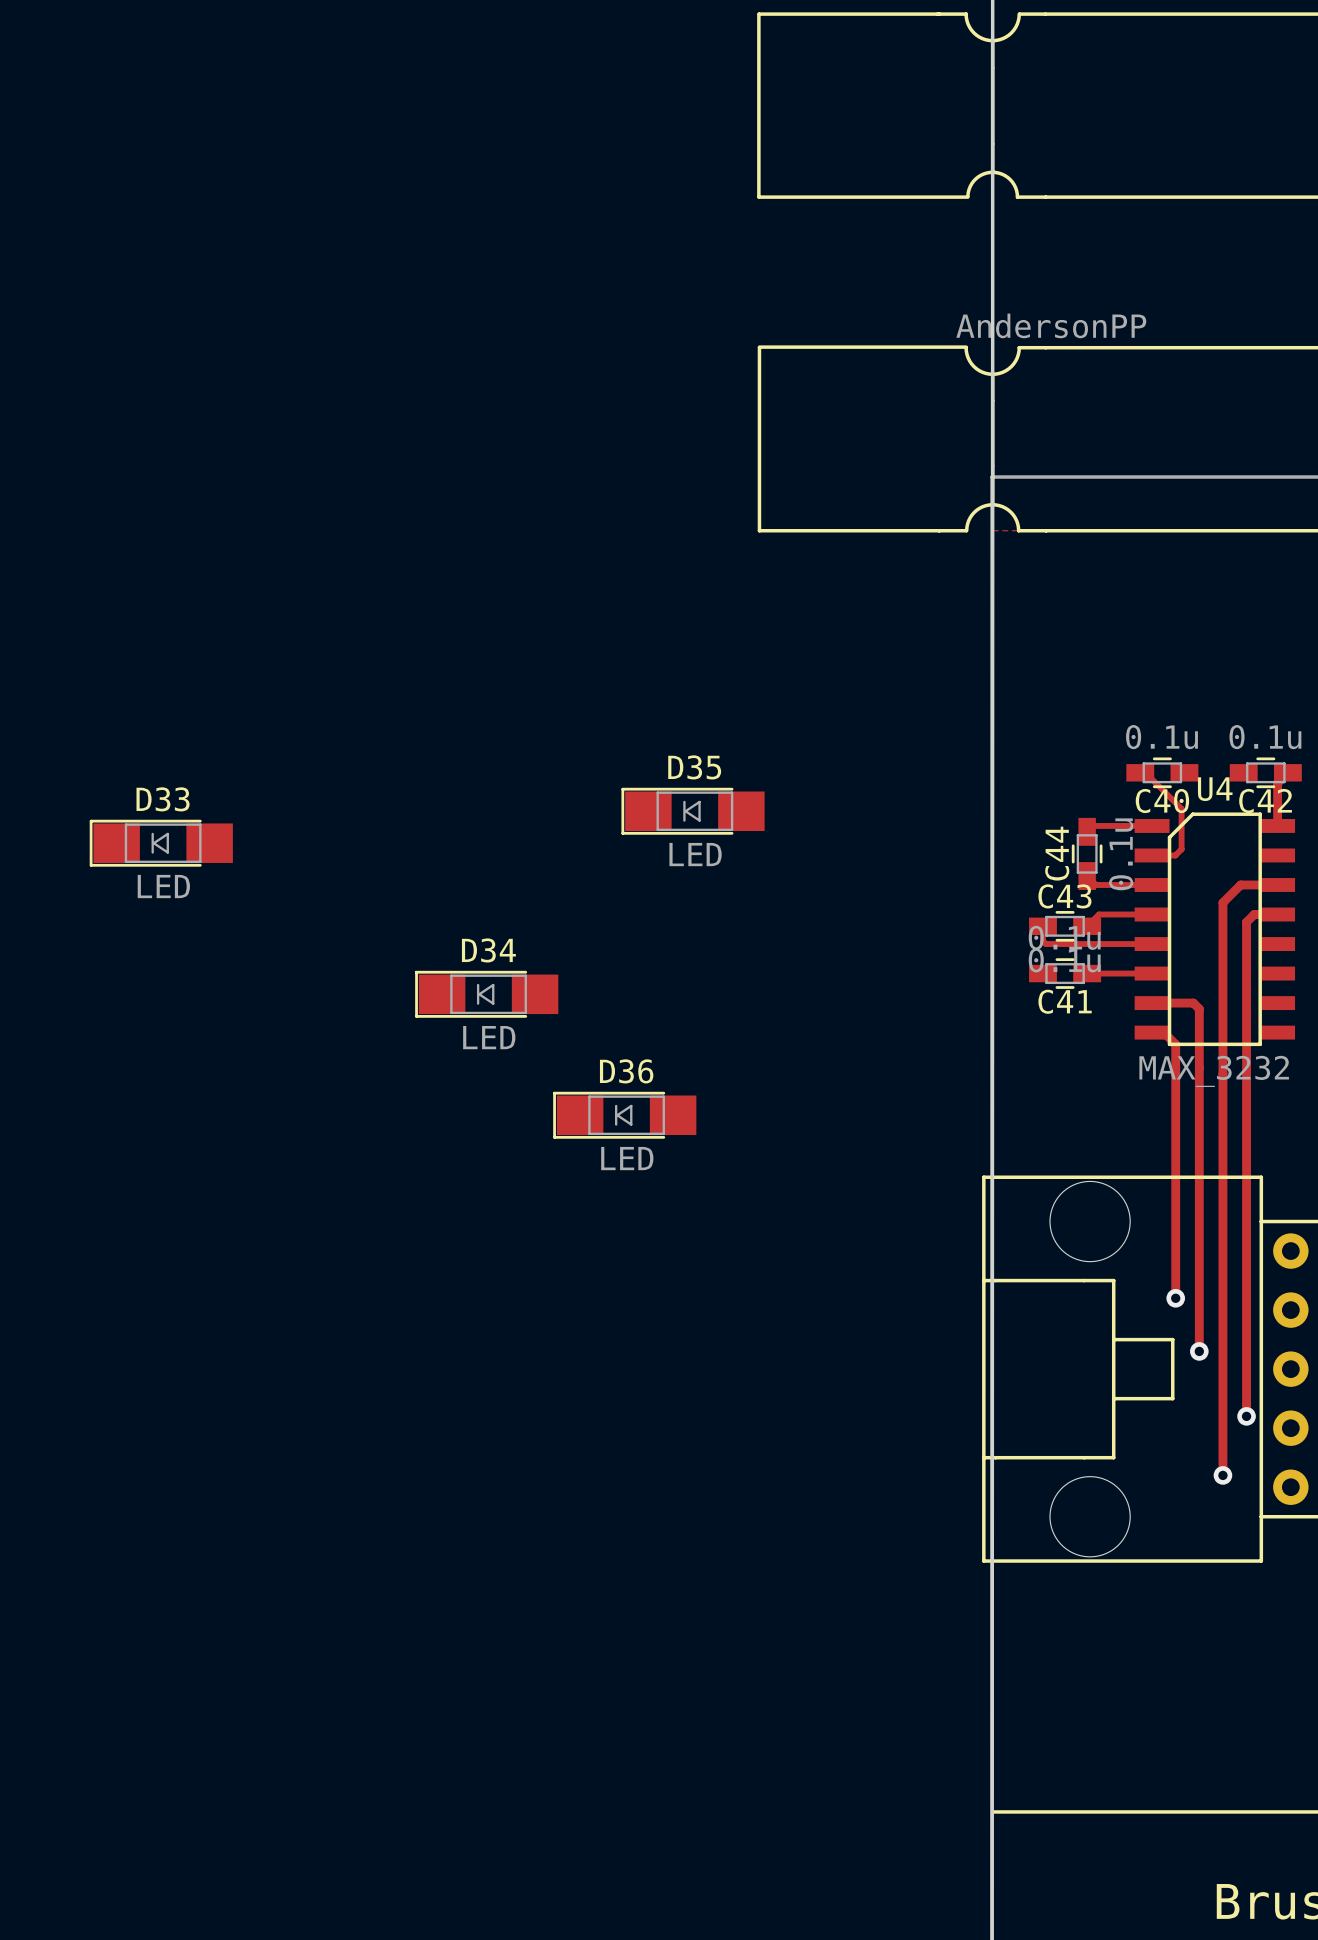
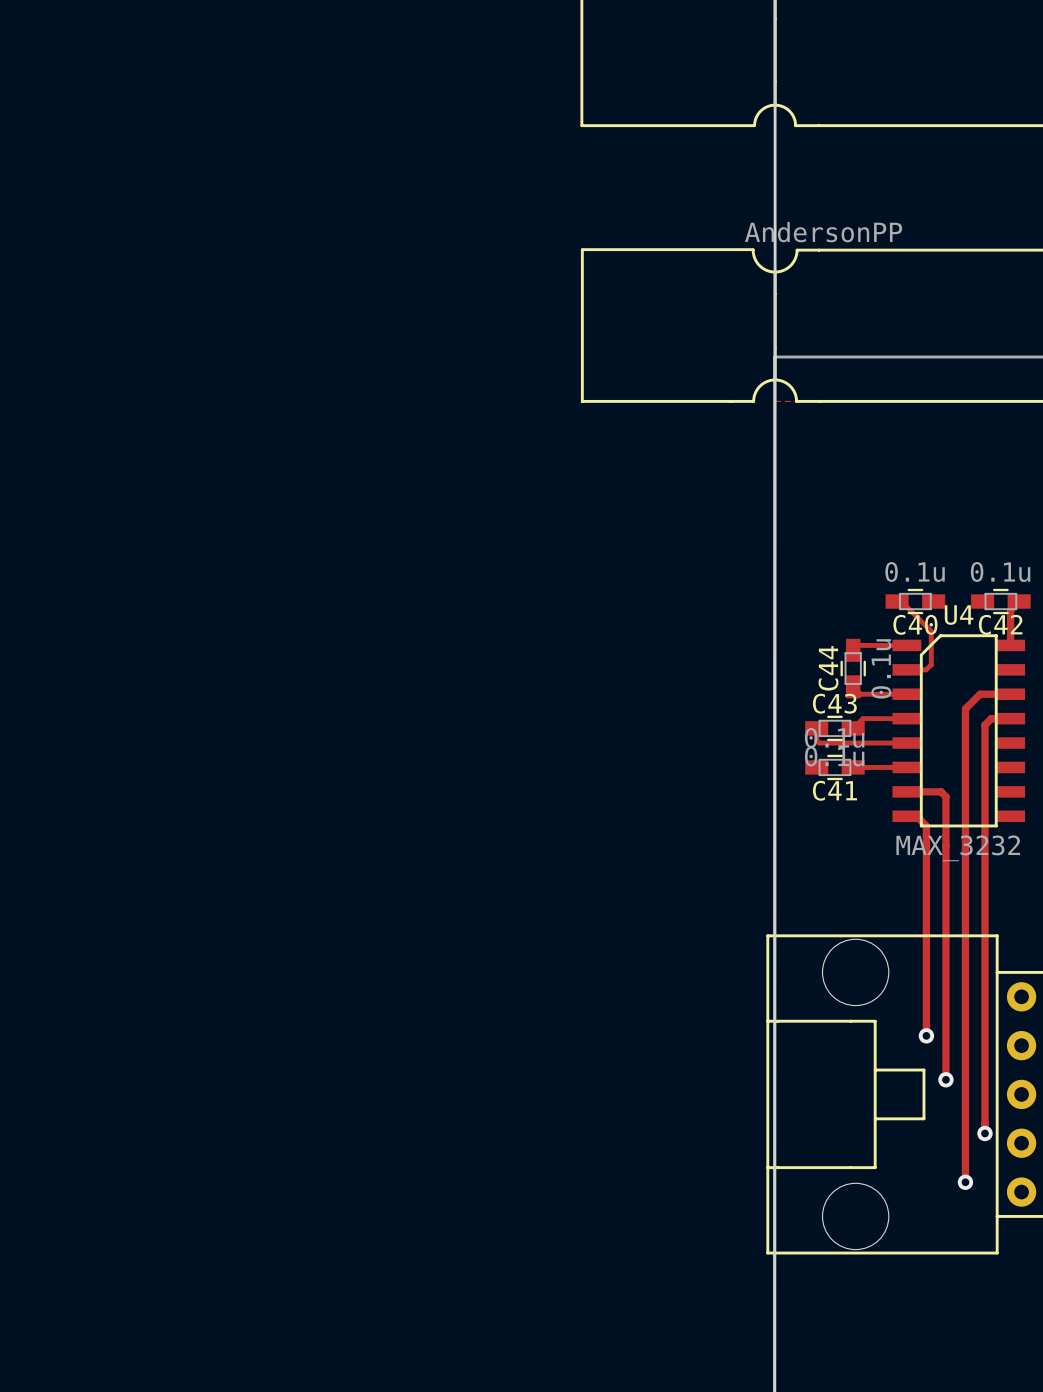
D35: LED (693, 811) -> none
D33: LED (161, 843) -> none
D34: LED (486, 994) -> none
D36: LED (624, 1115) -> none

